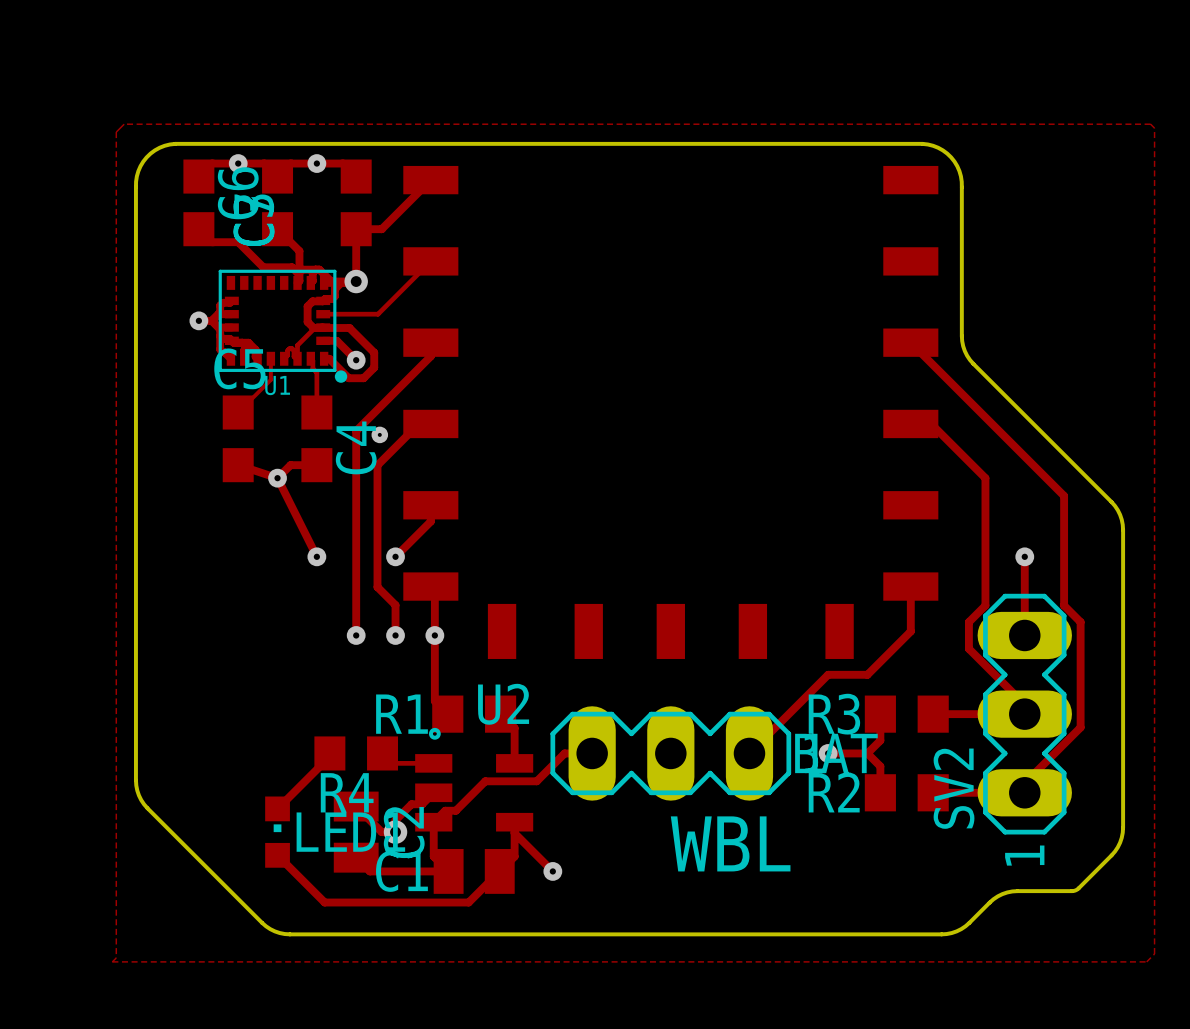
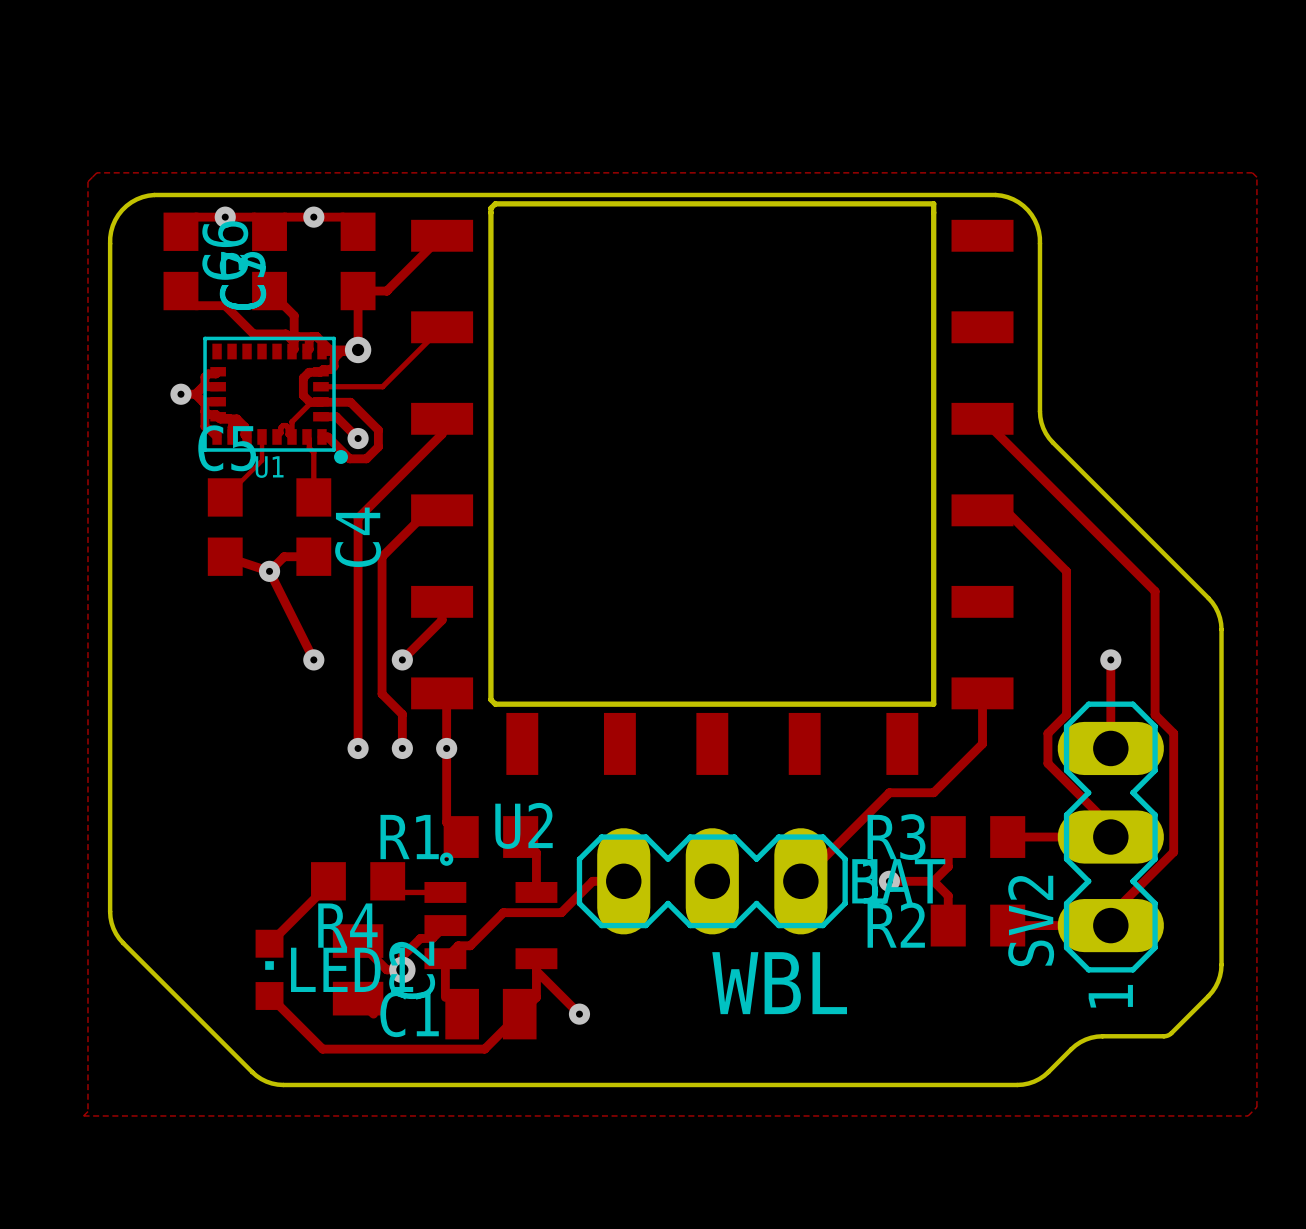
board edge: none -> (495, 203) (933, 203) (933, 704) (495, 704) (490, 699) (490, 208) (495, 203)
via: (379, 434) -> none
track: (433, 856) (448, 871) (369, 871) -> none

